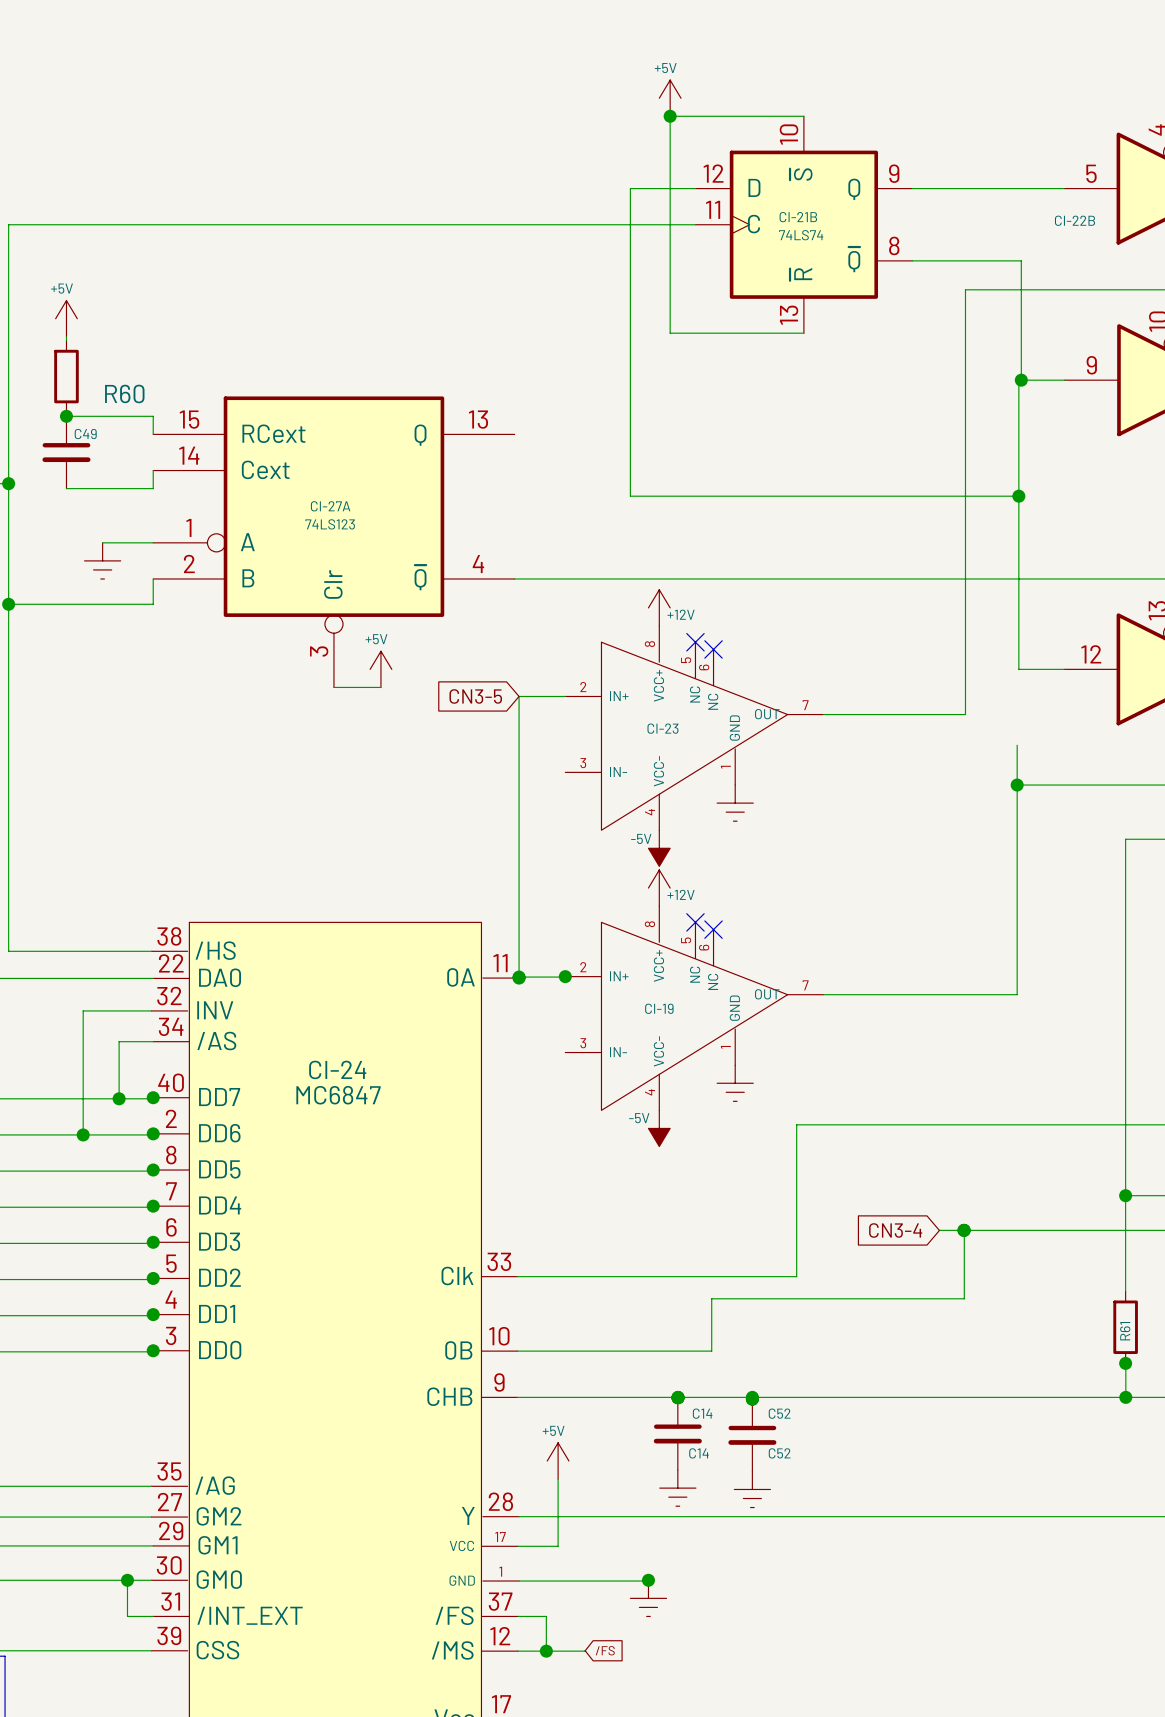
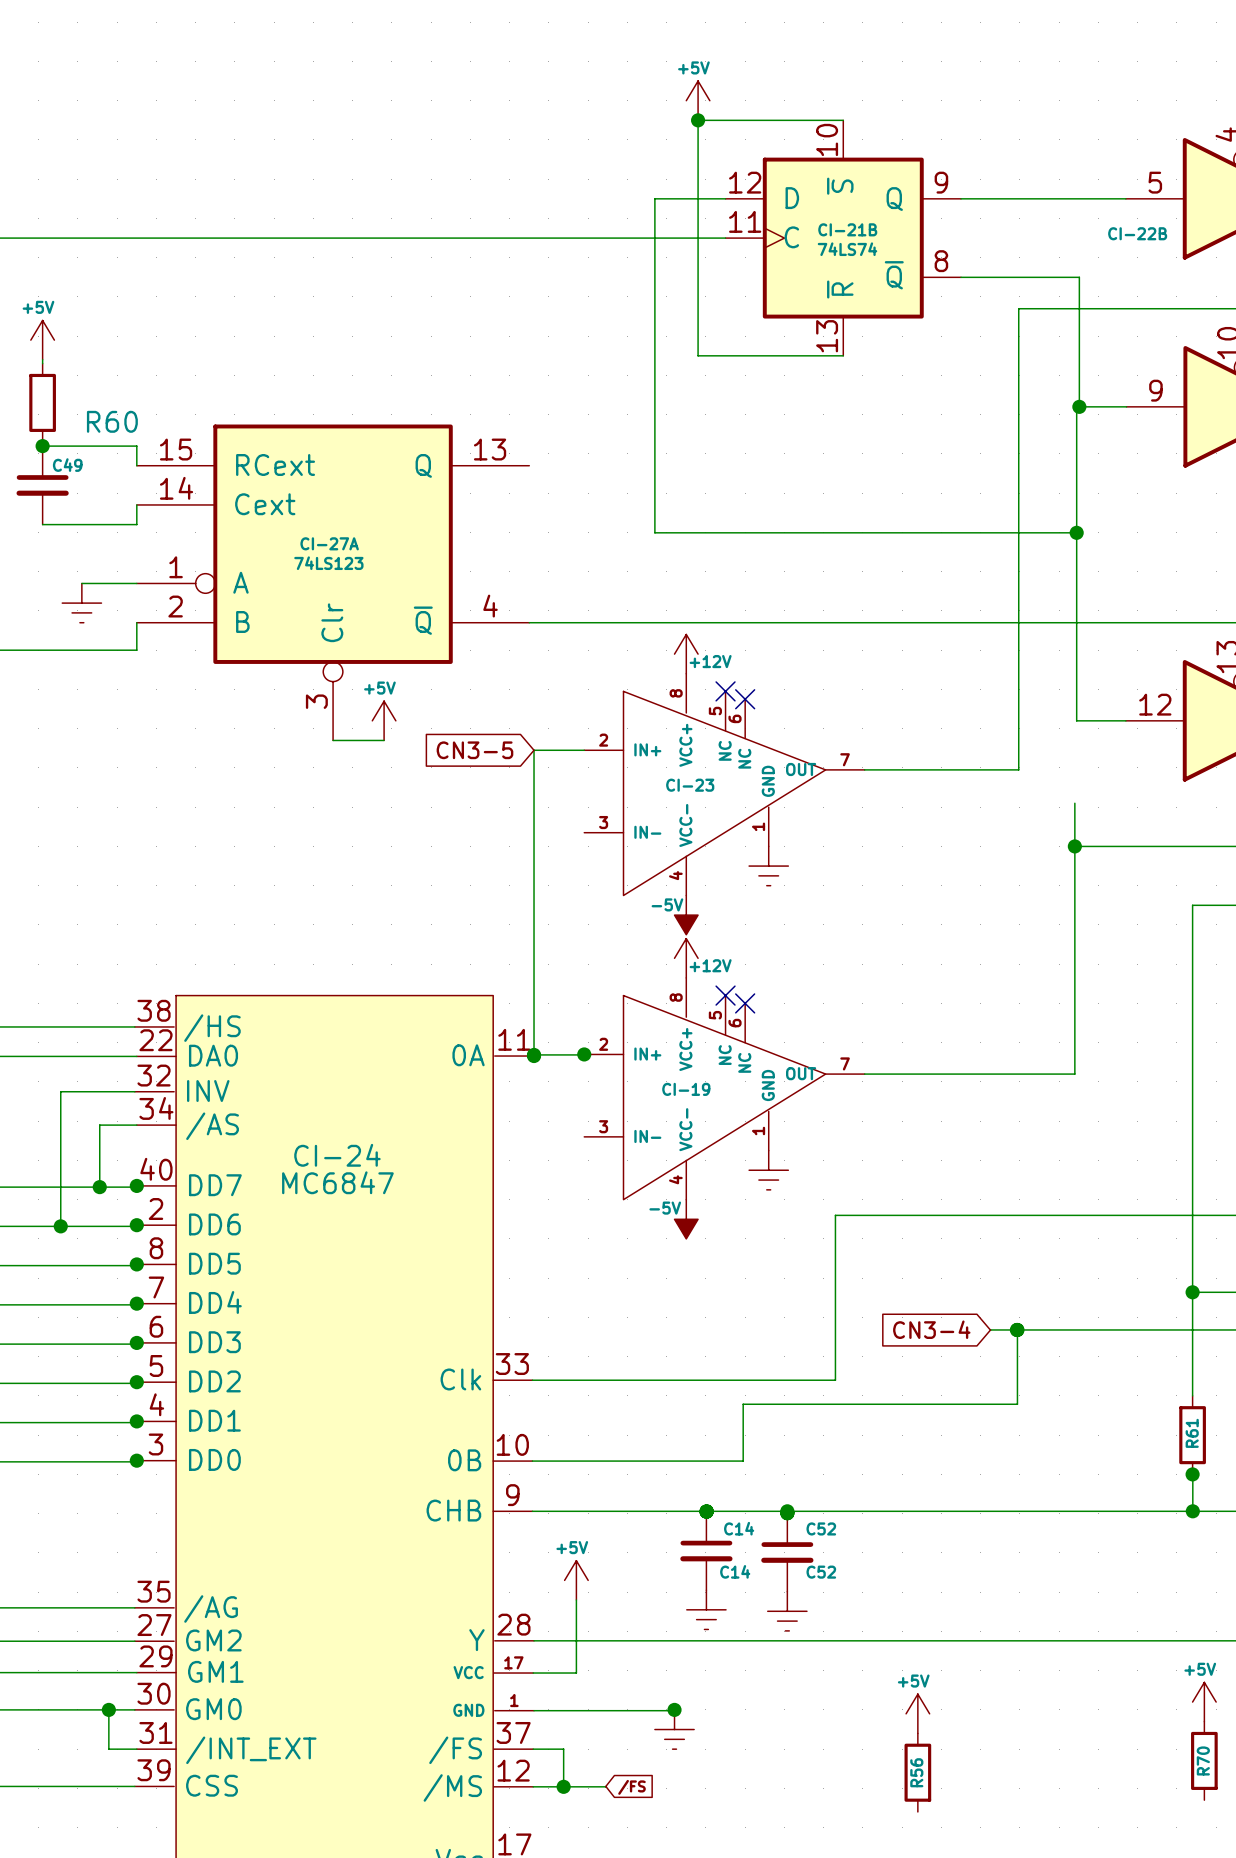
power symbol: none -> +5V (1204, 1702)
power symbol: none -> +5V (917, 1713)
part: none -> R70 (1204, 1760)
part: none -> R56 (917, 1772)

